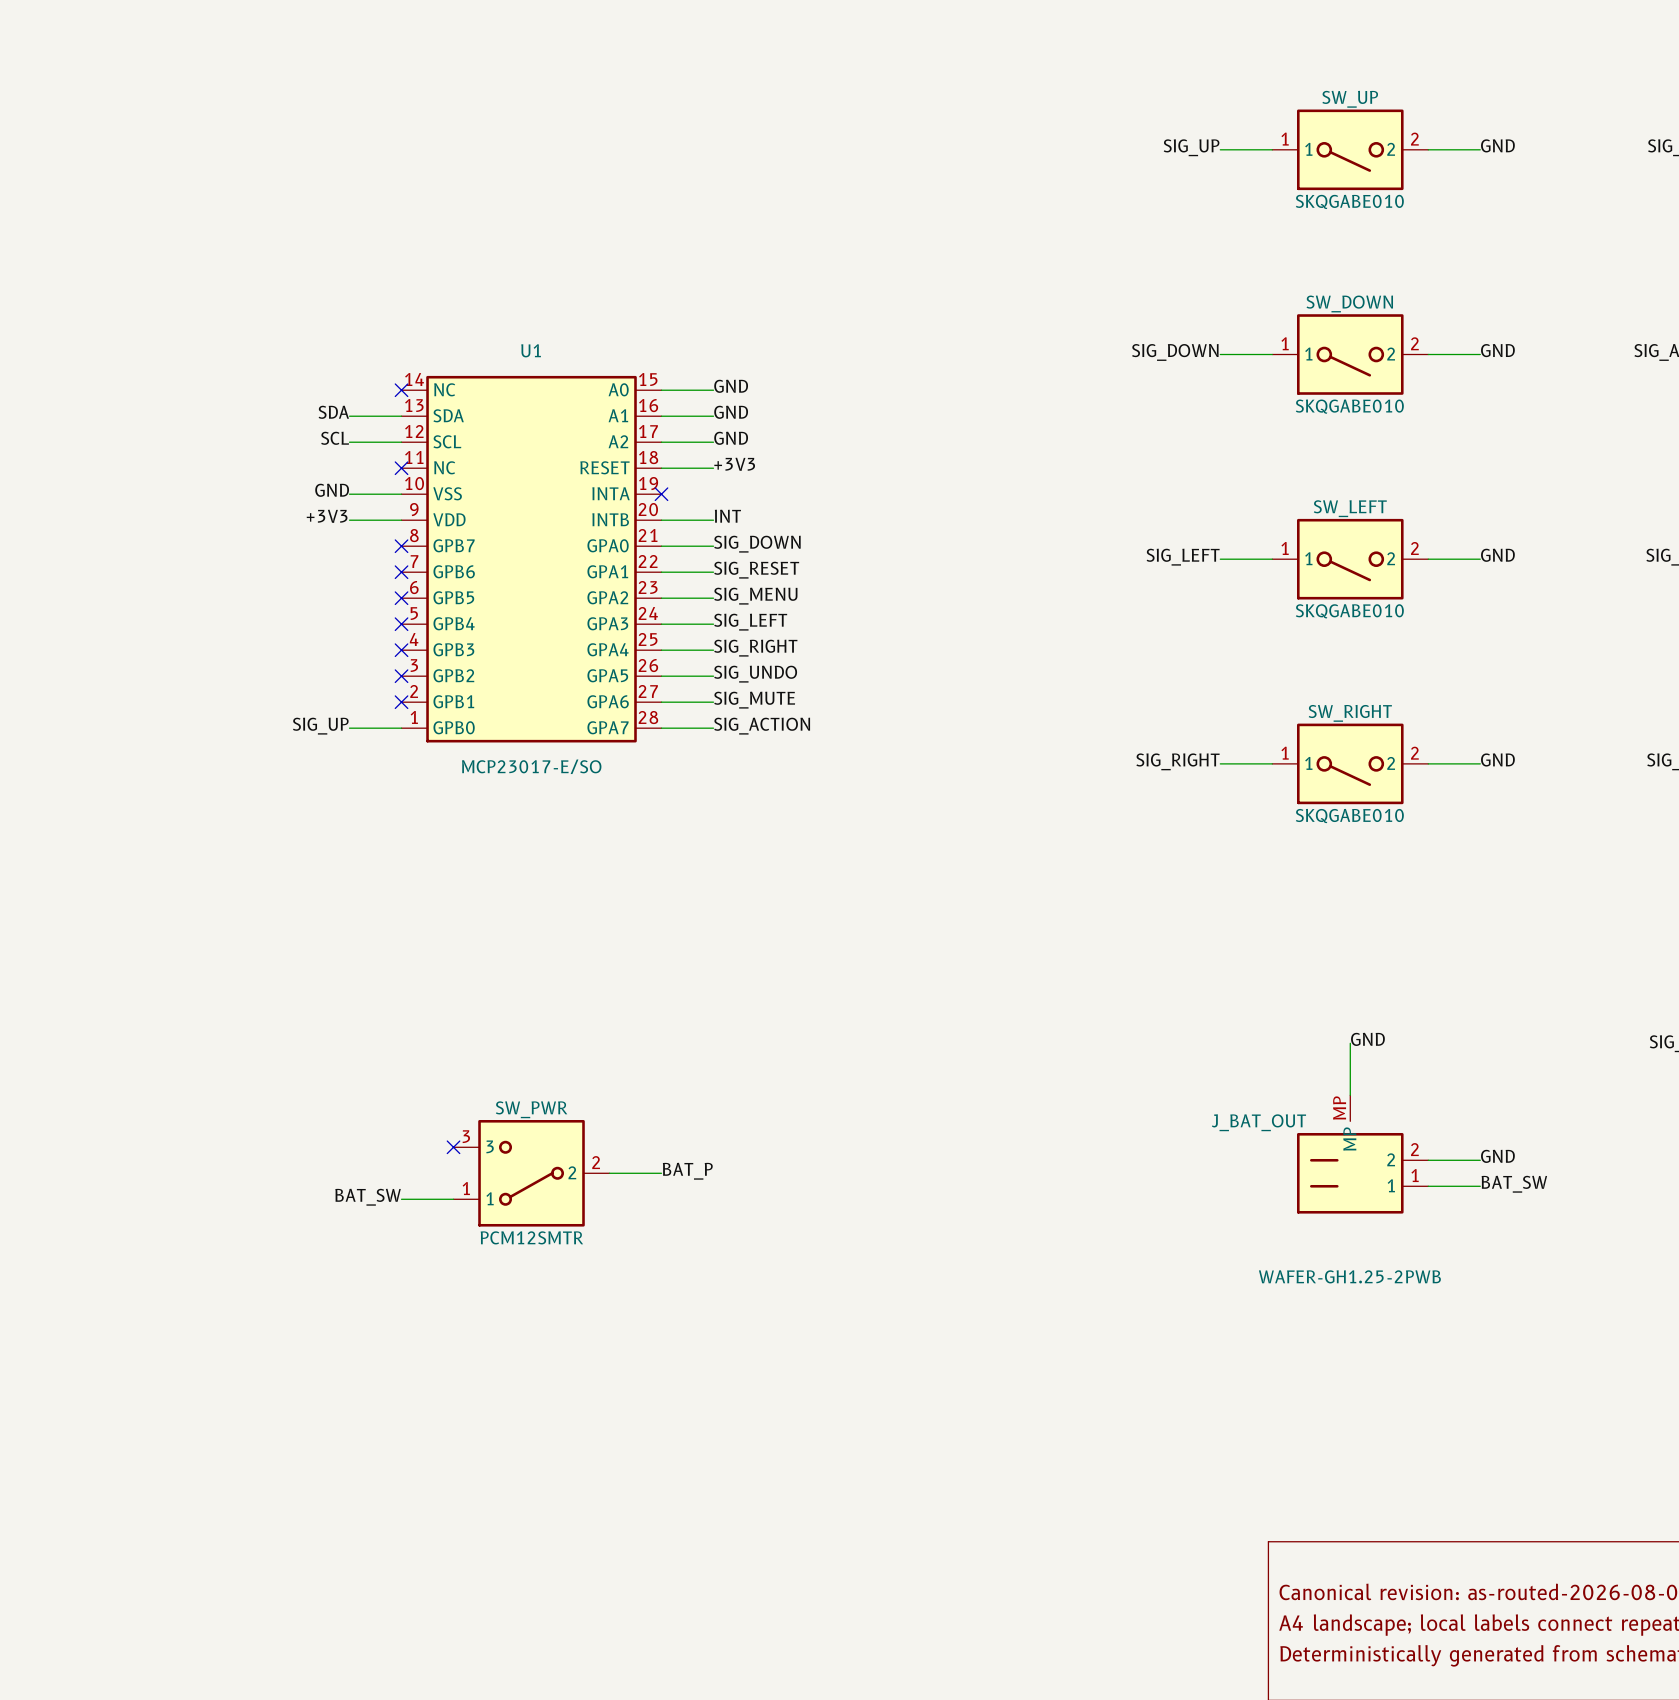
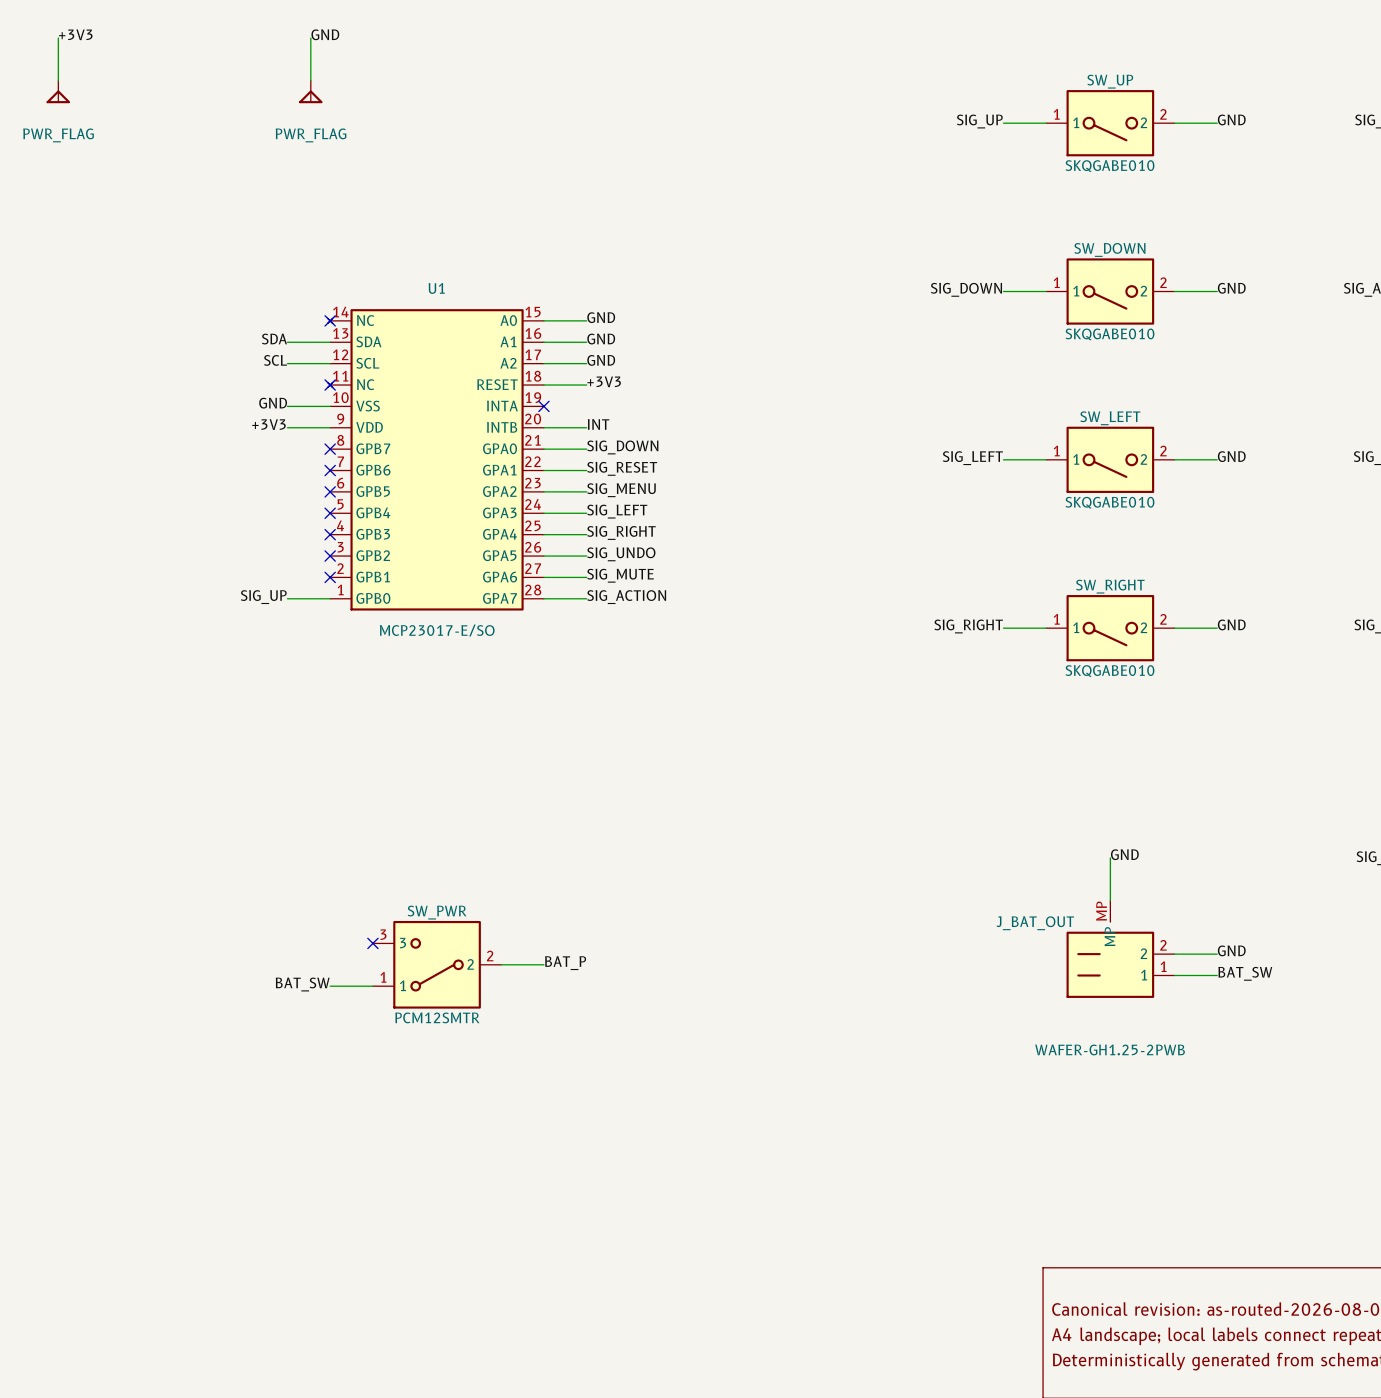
label: none -> +3V3 (75, 34)
label: none -> GND (325, 34)
wire: none -> (58, 38) (58, 80)
wire: none -> (310, 38) (310, 80)
power symbol: none -> PWR_FLAG (58, 91)
power symbol: none -> PWR_FLAG (310, 91)
U1 symbol: [401, 375, 662, 743] -> [327, 309, 544, 611]

